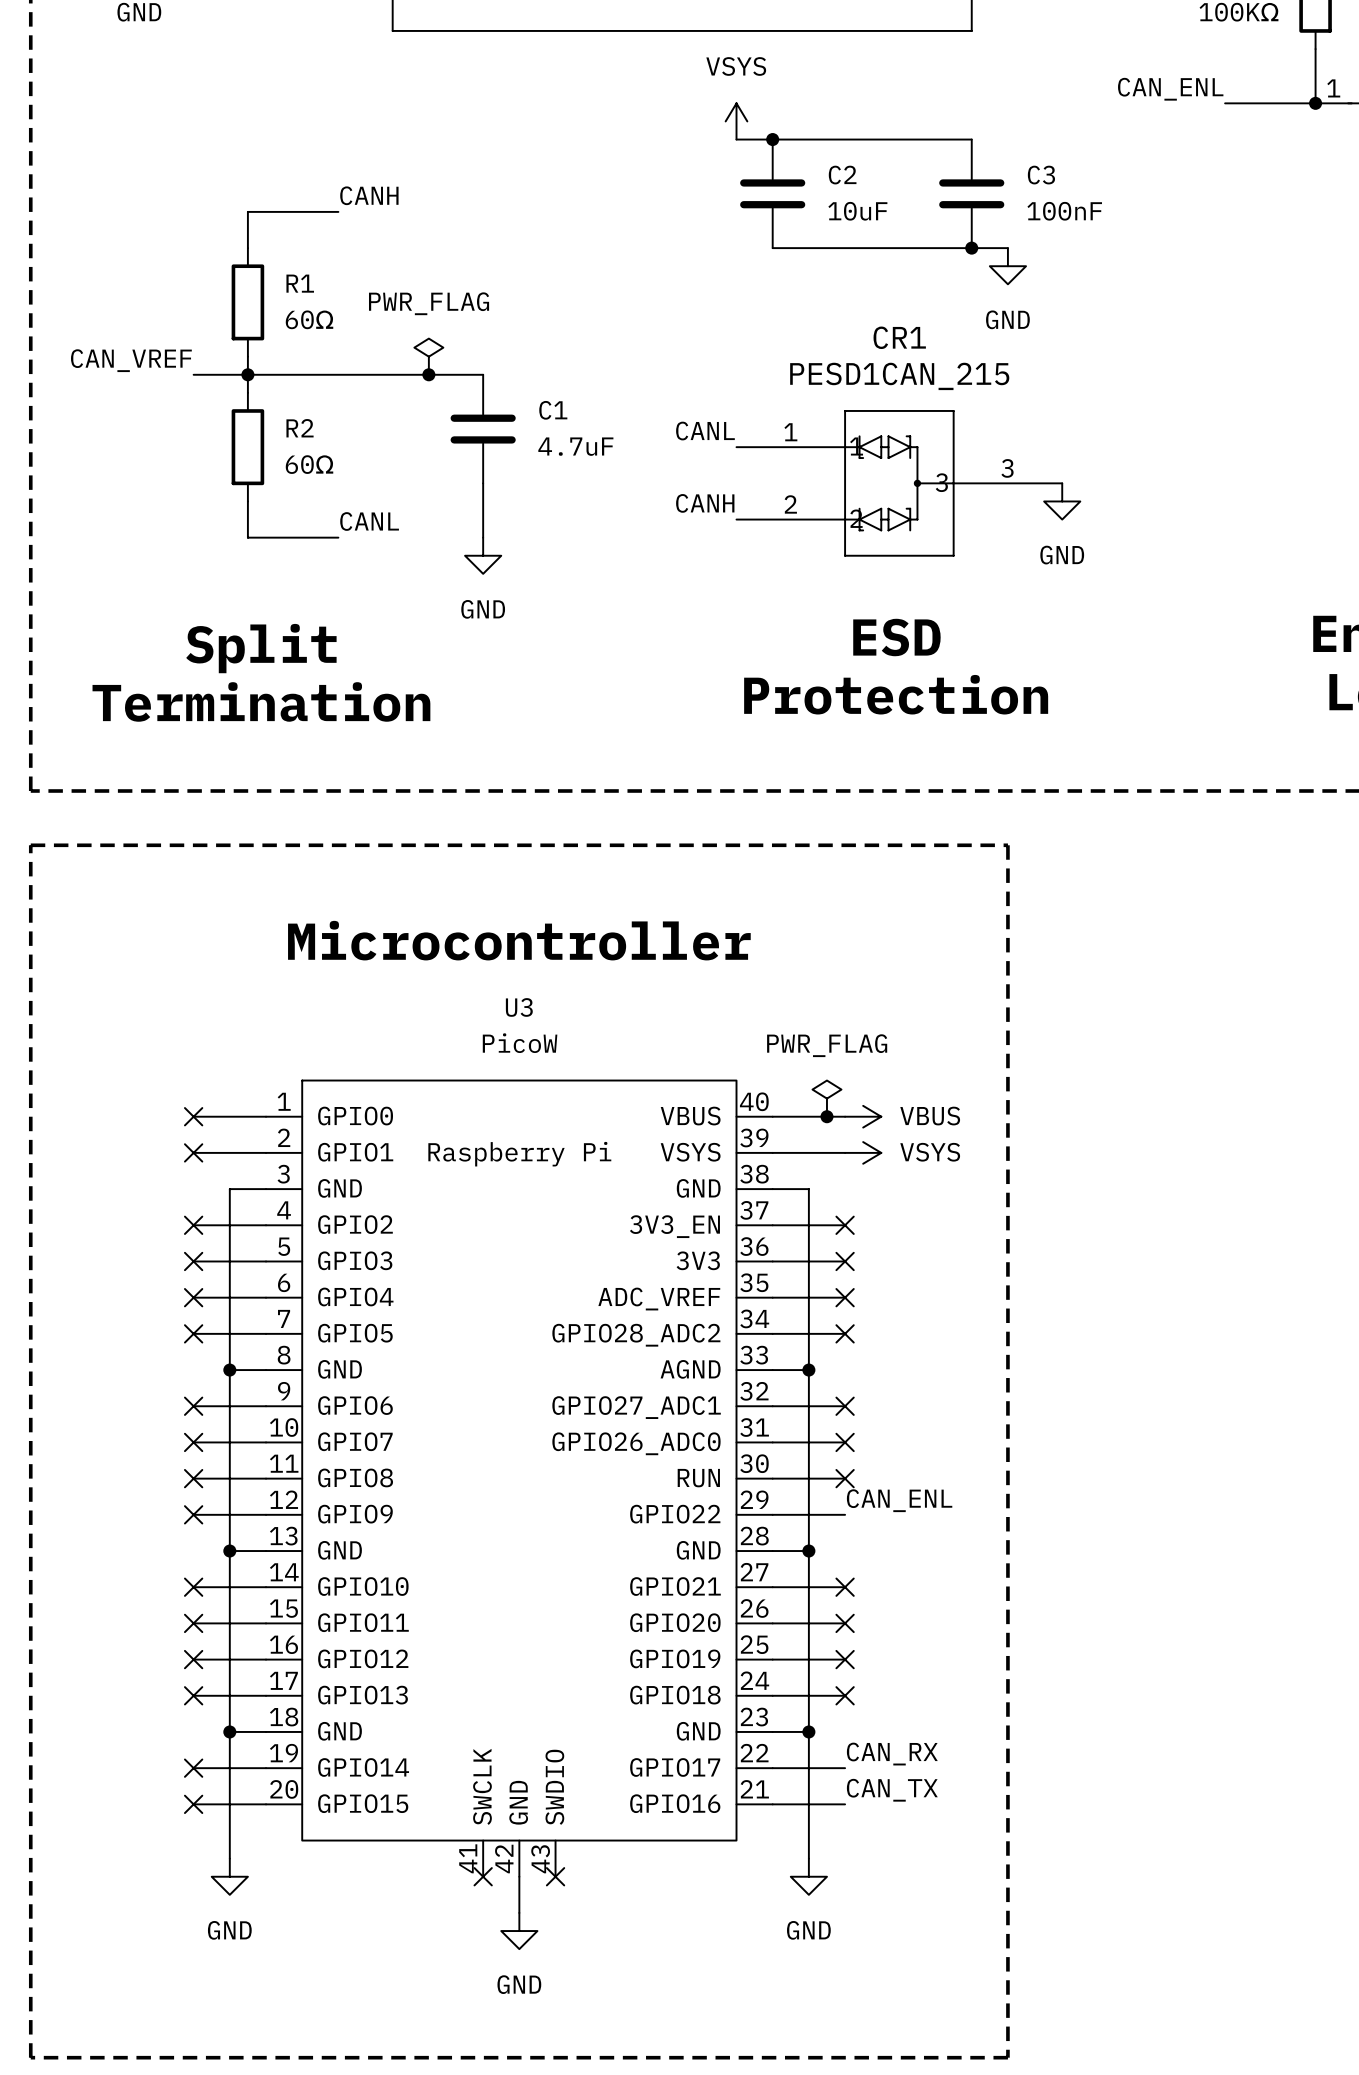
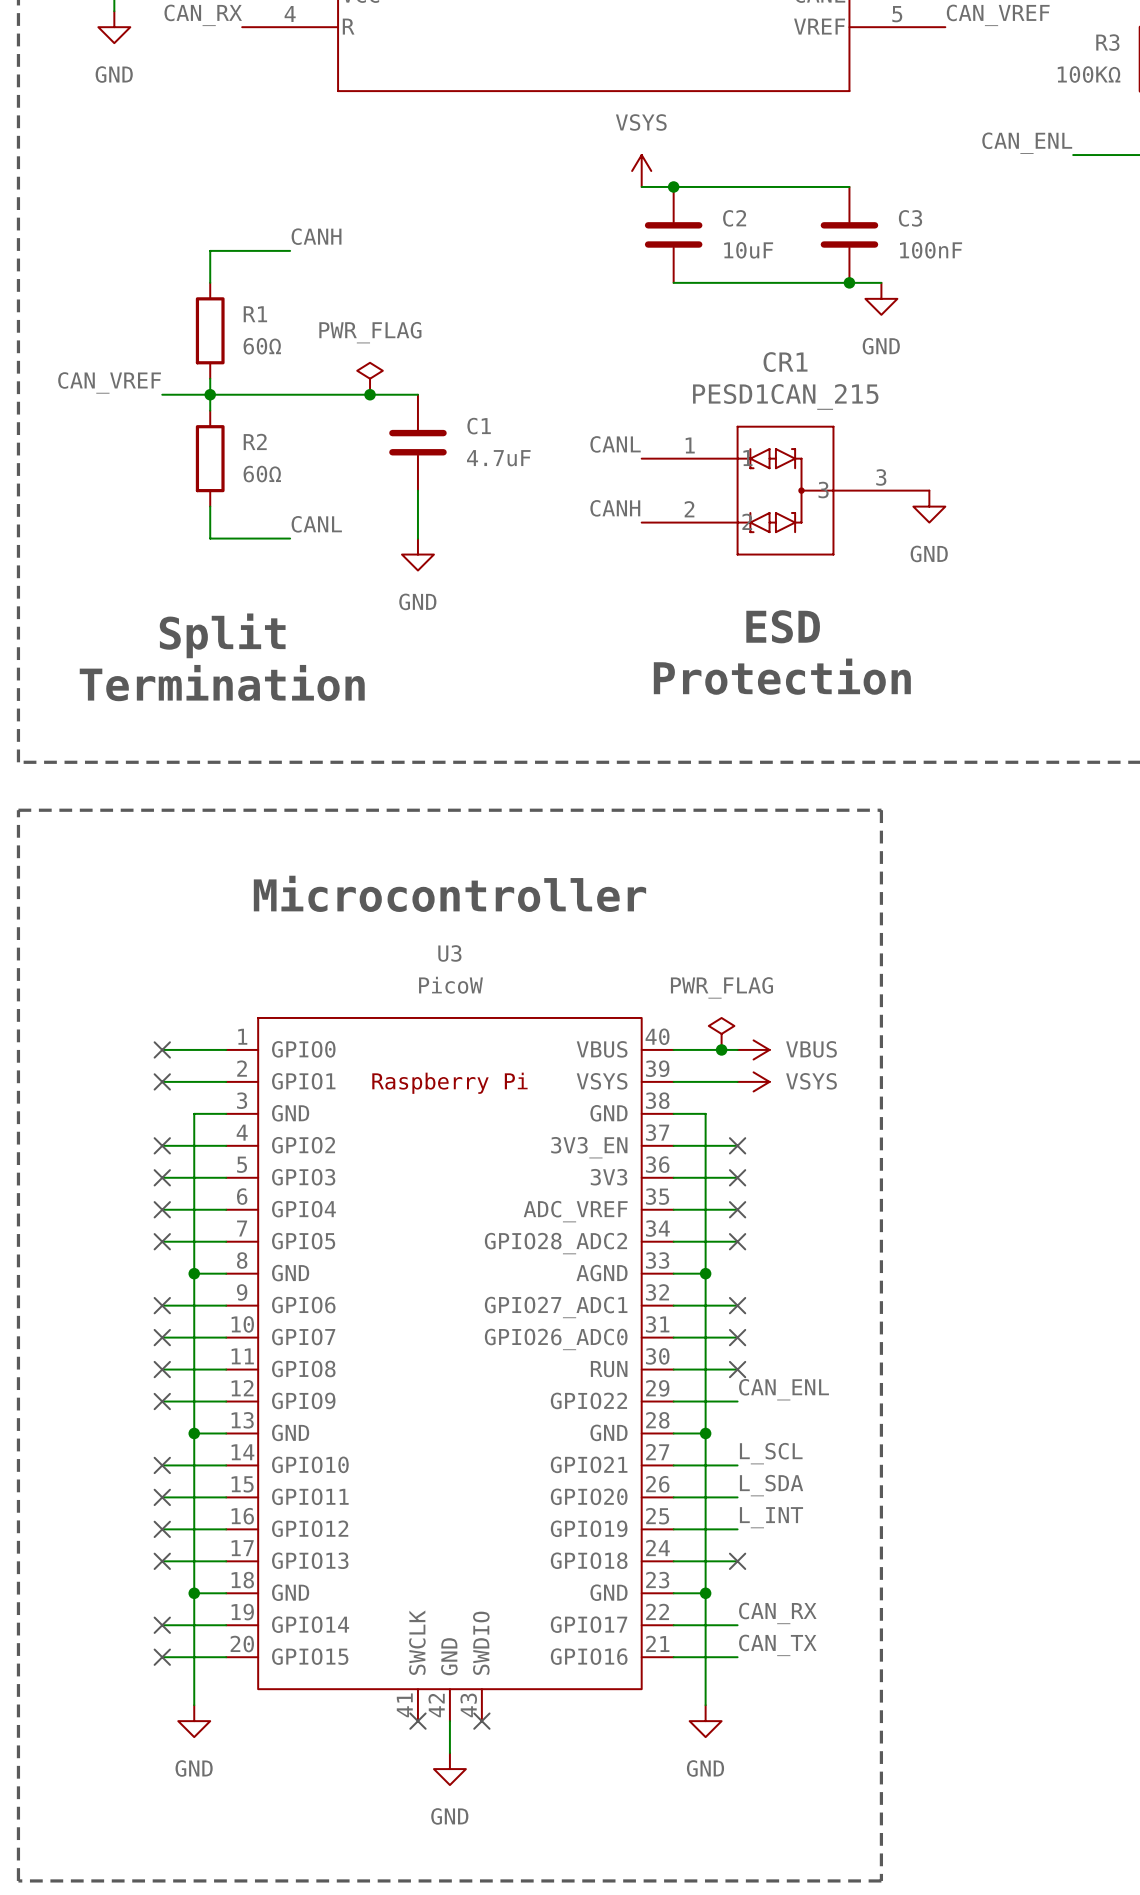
label: none -> L_SCL (771, 1453)
no-connect mark: (845, 1587) -> none
label: none -> L_SDA (771, 1485)
no-connect mark: (845, 1623) -> none
label: none -> L_INT (771, 1517)
no-connect mark: (845, 1659) -> none

